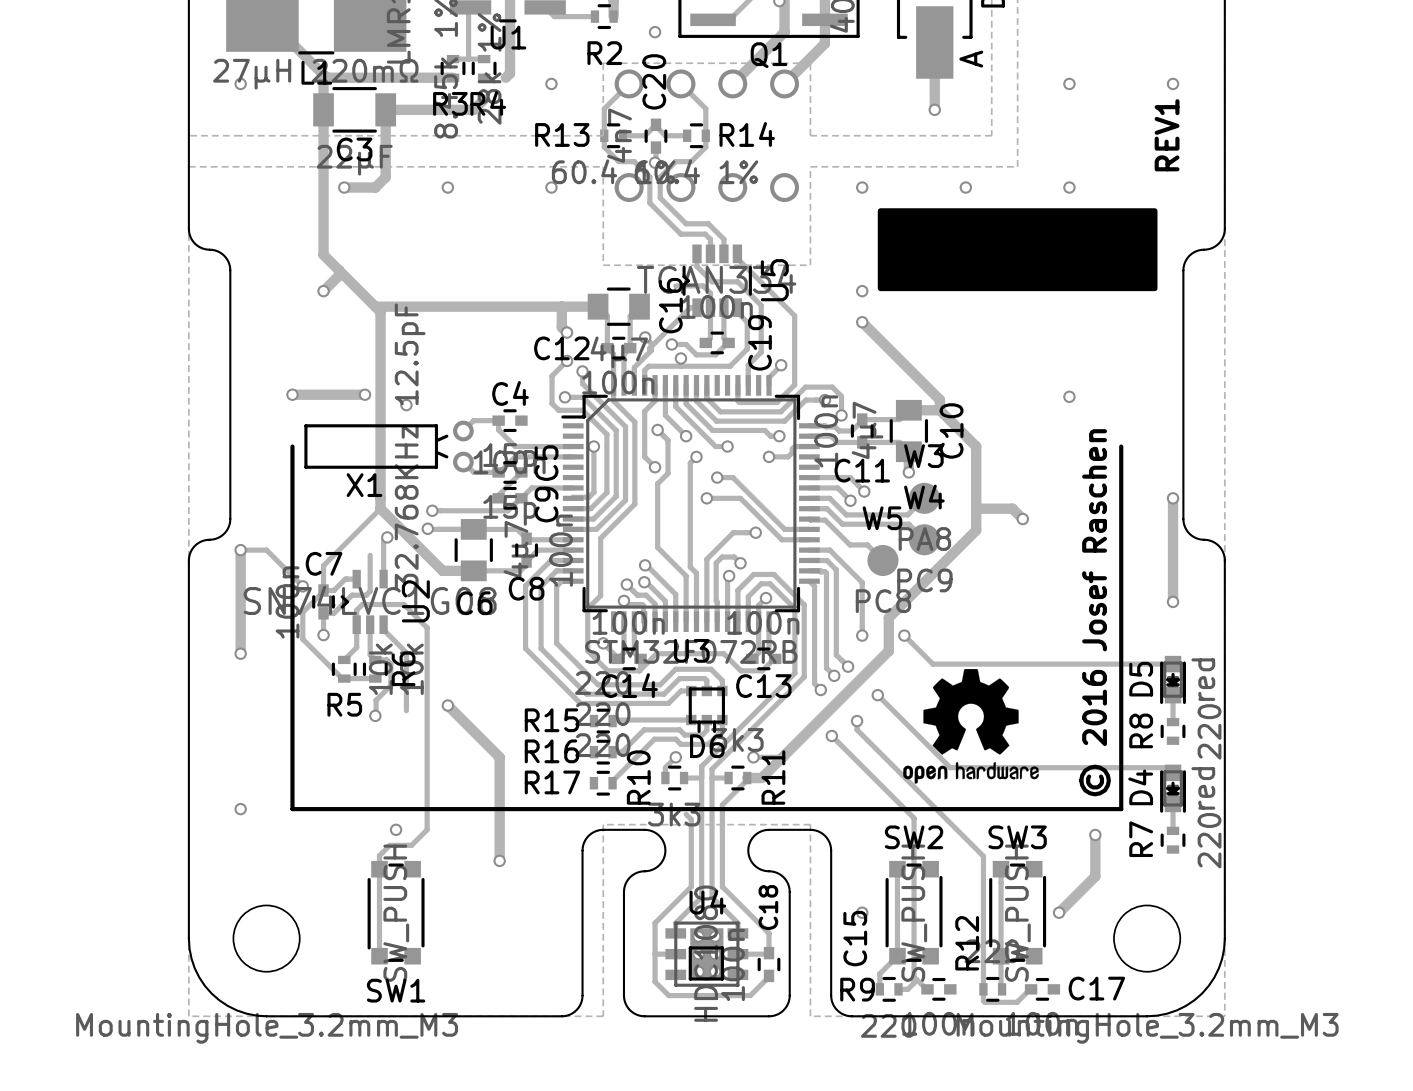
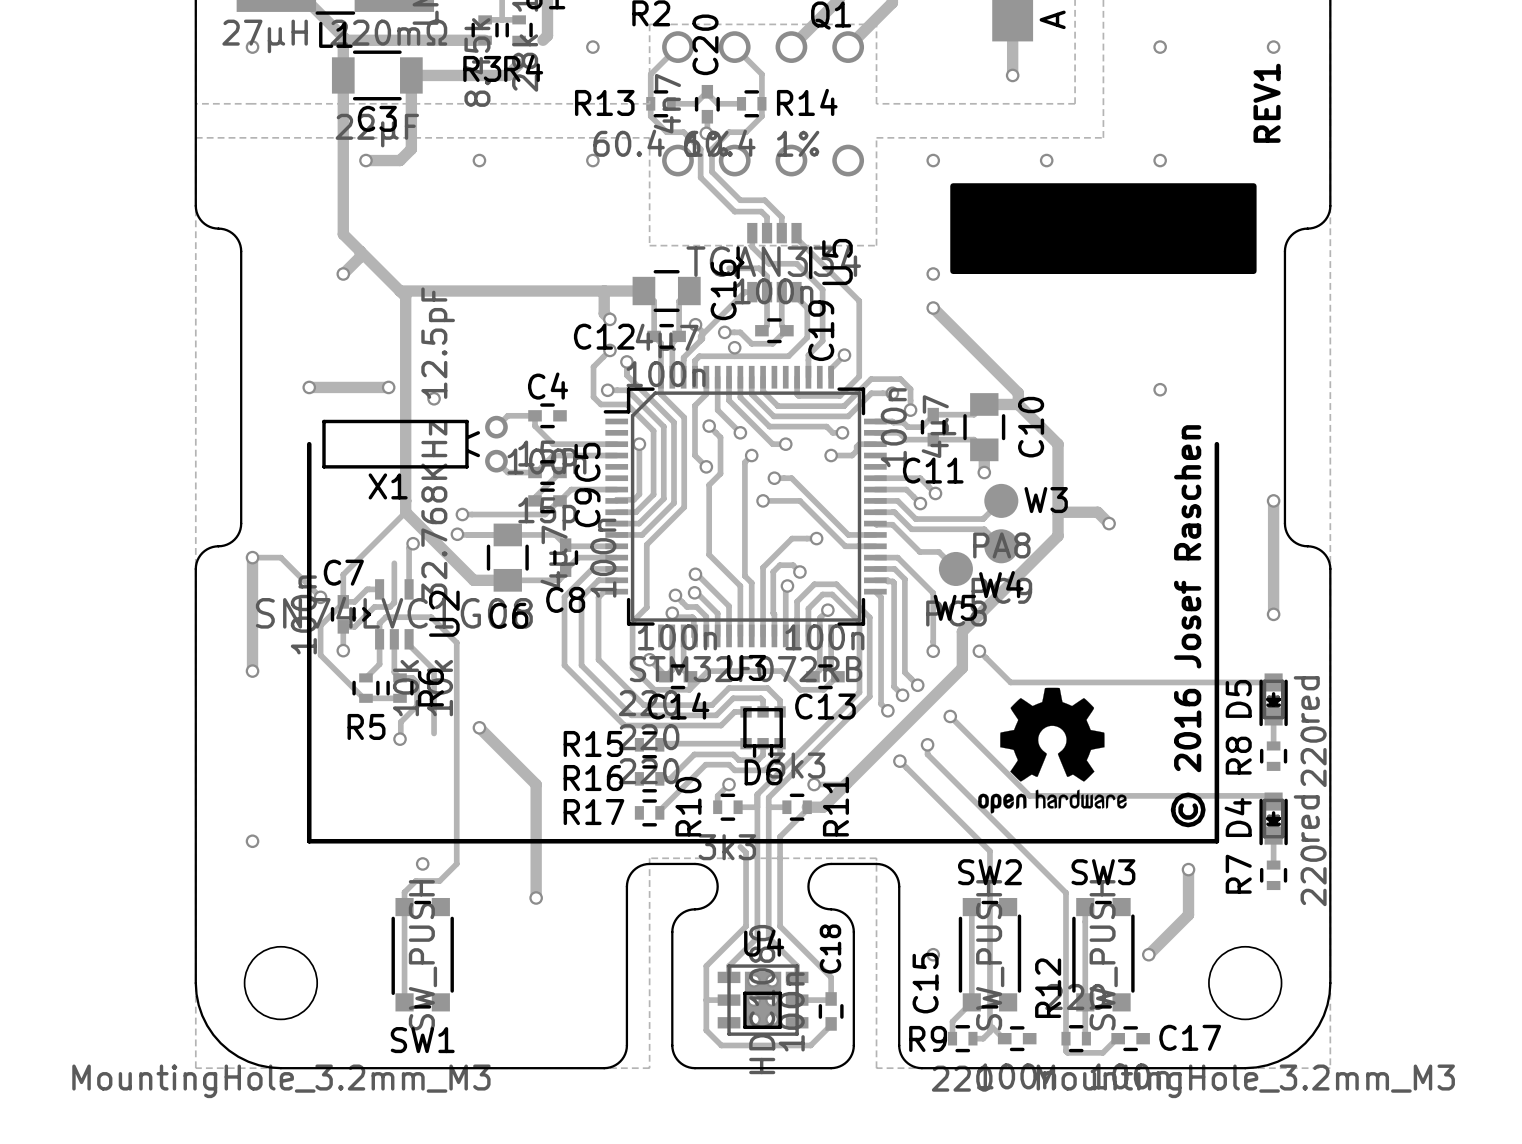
W3 name position: W3 (923, 456) -> W3 (1046, 500)
W4 name position: W4 (924, 497) -> W4 (1001, 584)
W5 name position: W5 (882, 518) -> W5 (955, 607)

